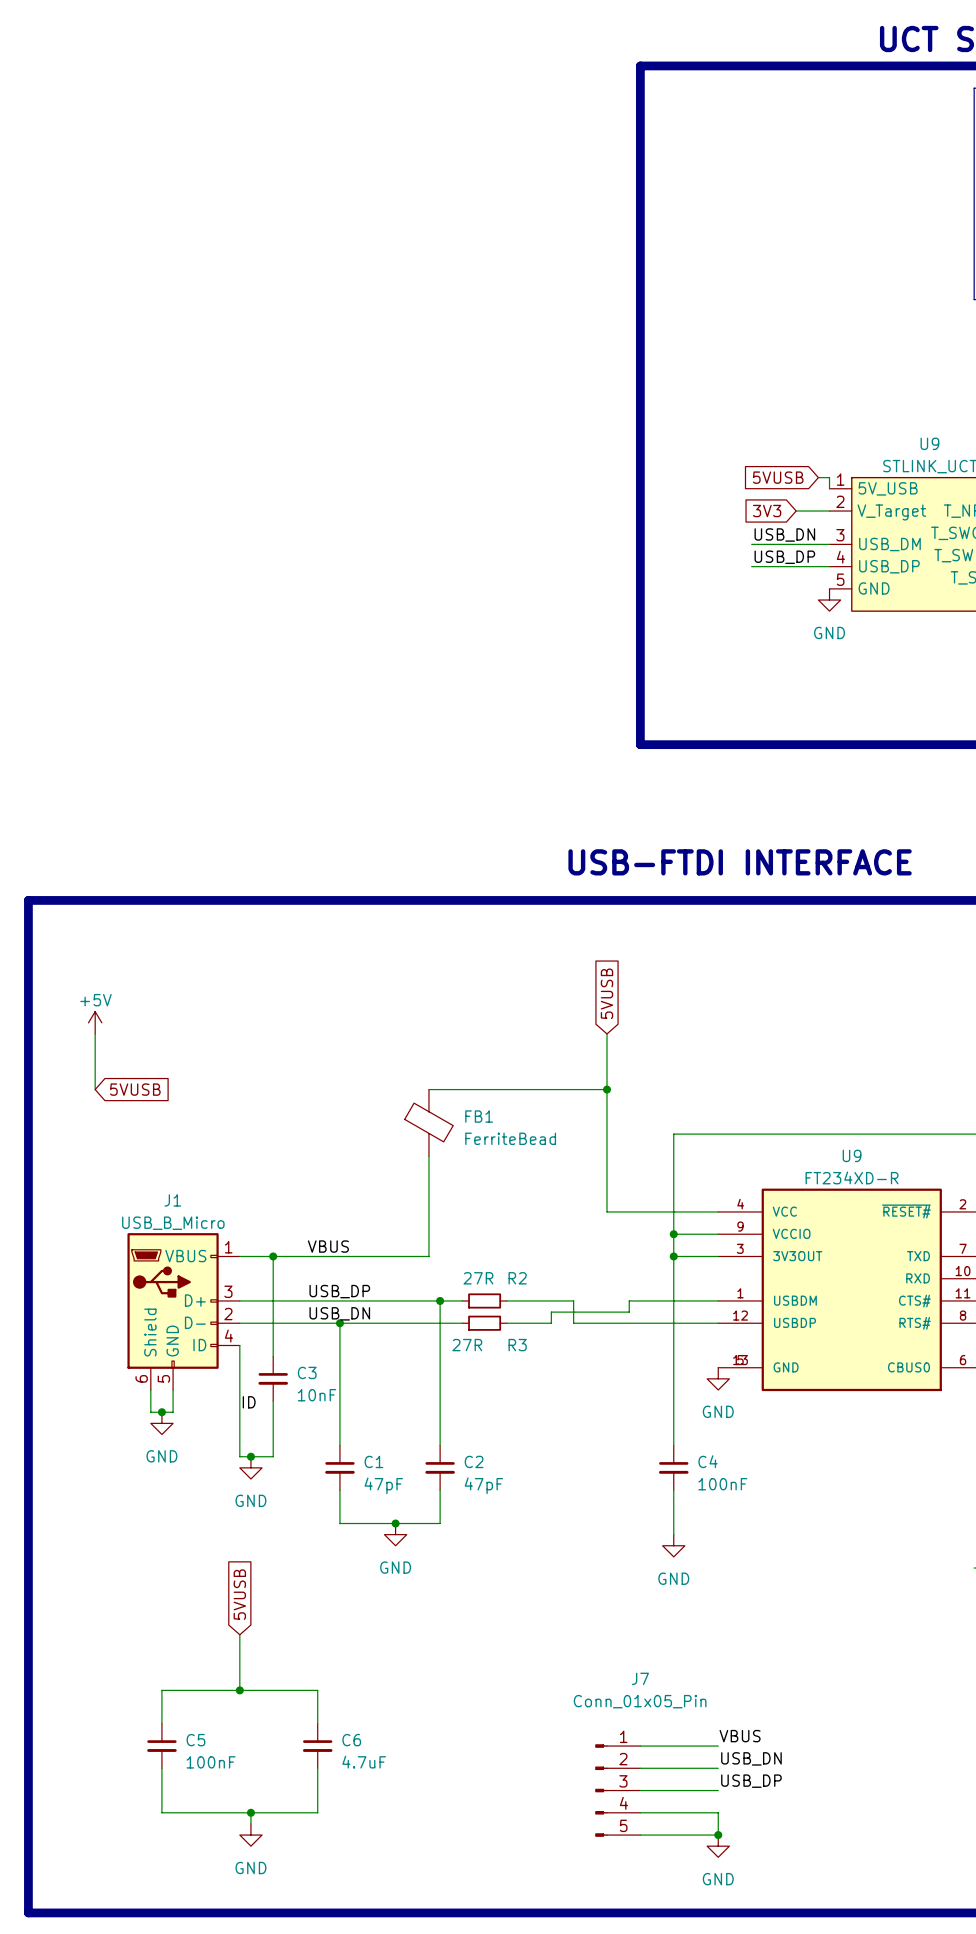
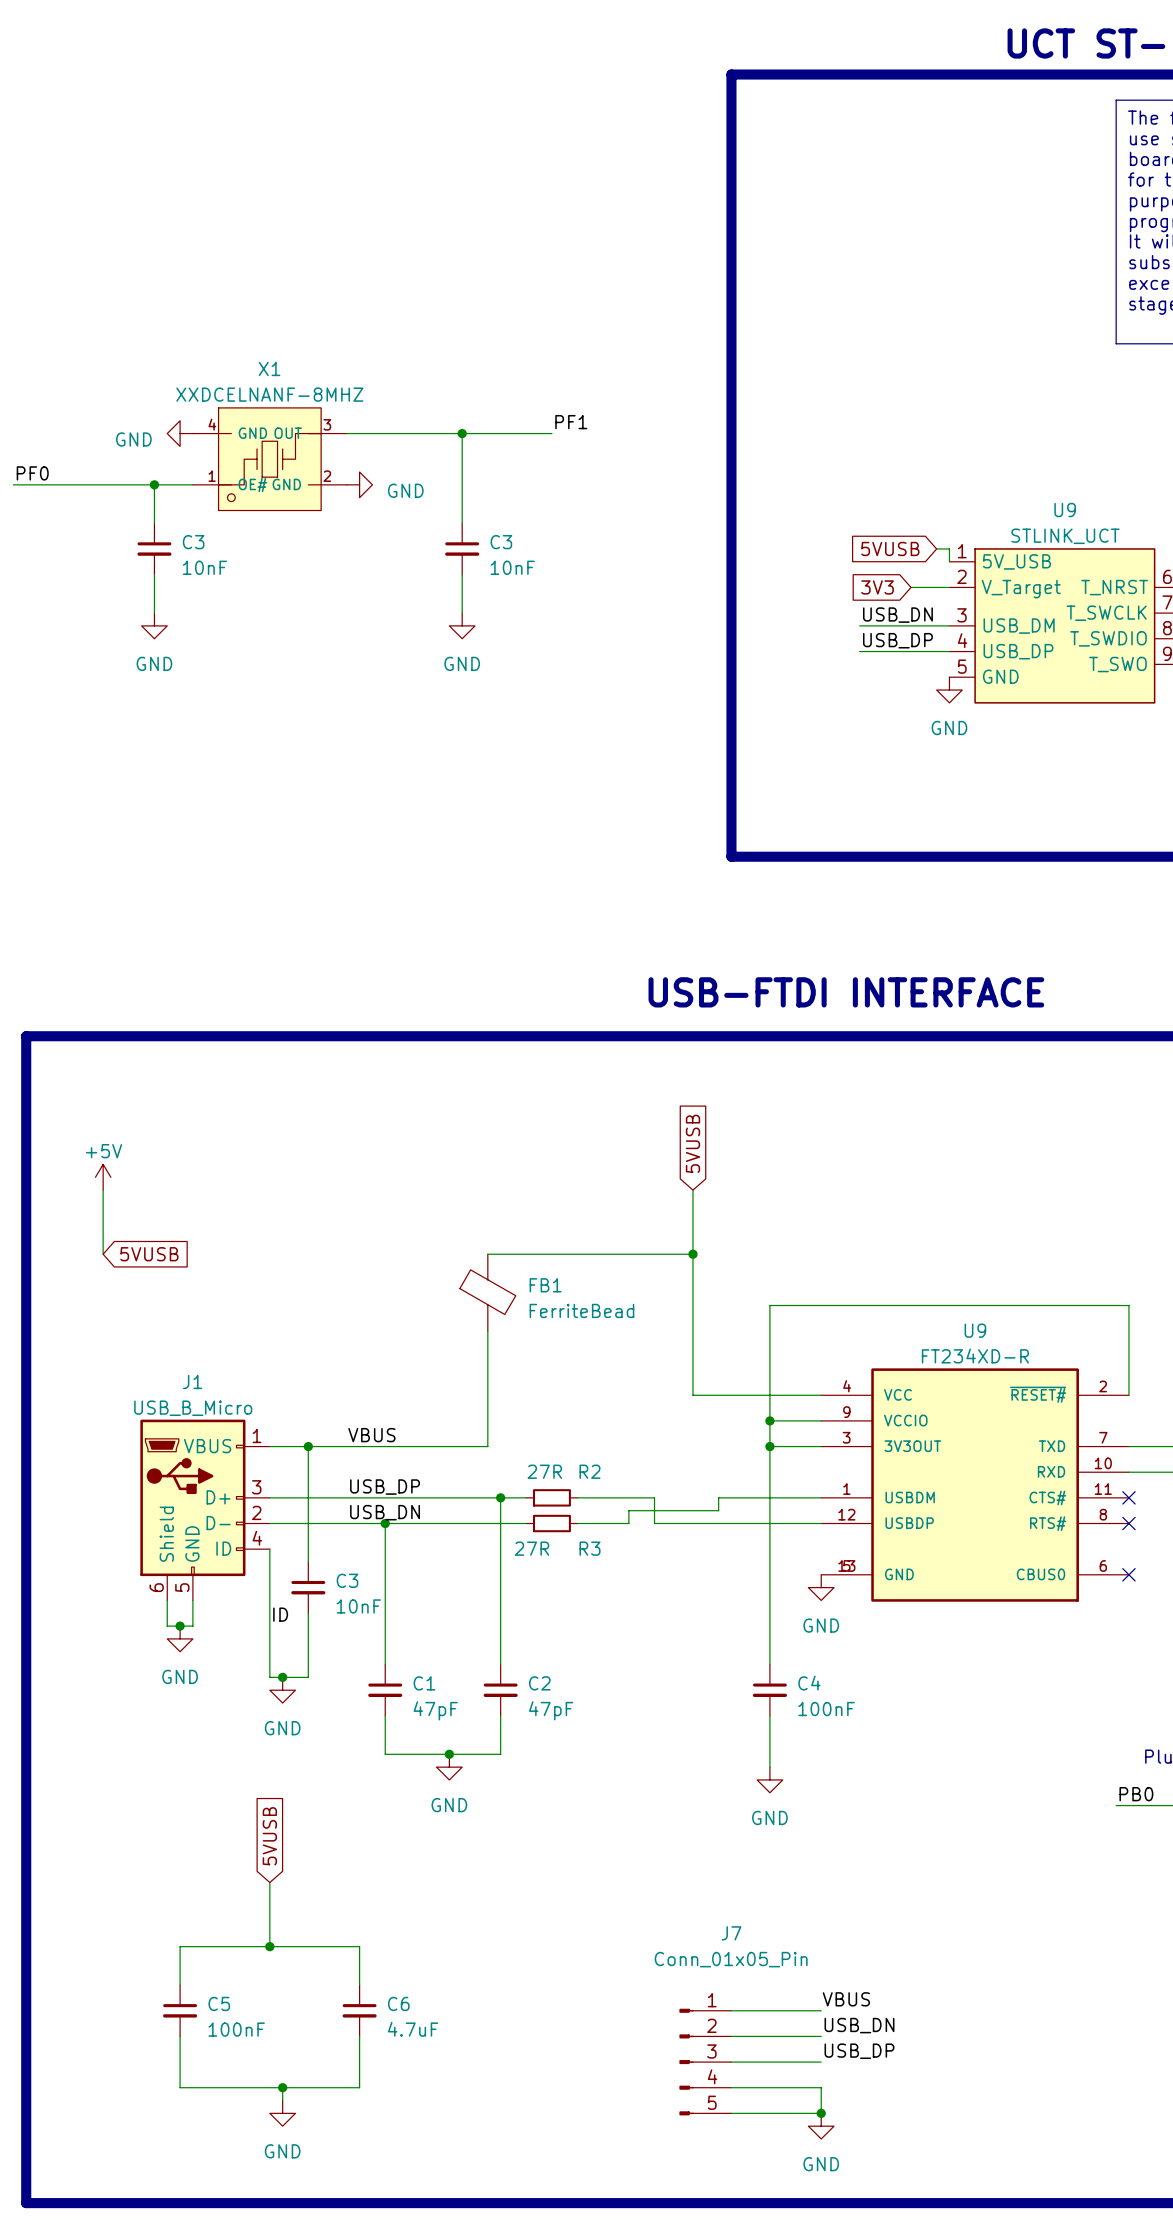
label: none -> PF1 (571, 422)
power symbol: none -> GND (180, 433)
wire: none -> (346, 433) (551, 433)
wire: none -> (462, 433) (462, 523)
junction: none -> (462, 433)
X1: none -> XXDCELNANF-8MHZ (269, 459)
label: none -> PF0 (32, 473)
wire: none -> (13, 484) (192, 484)
wire: none -> (154, 484) (154, 523)
junction: none -> (154, 484)
power symbol: none -> GND (359, 484)
C3: none -> 10nF (154, 548)
C3: none -> 10nF (462, 548)
wire: none -> (154, 574) (154, 613)
wire: none -> (462, 574) (462, 613)
power symbol: none -> GND (154, 625)
power symbol: none -> GND (462, 625)

